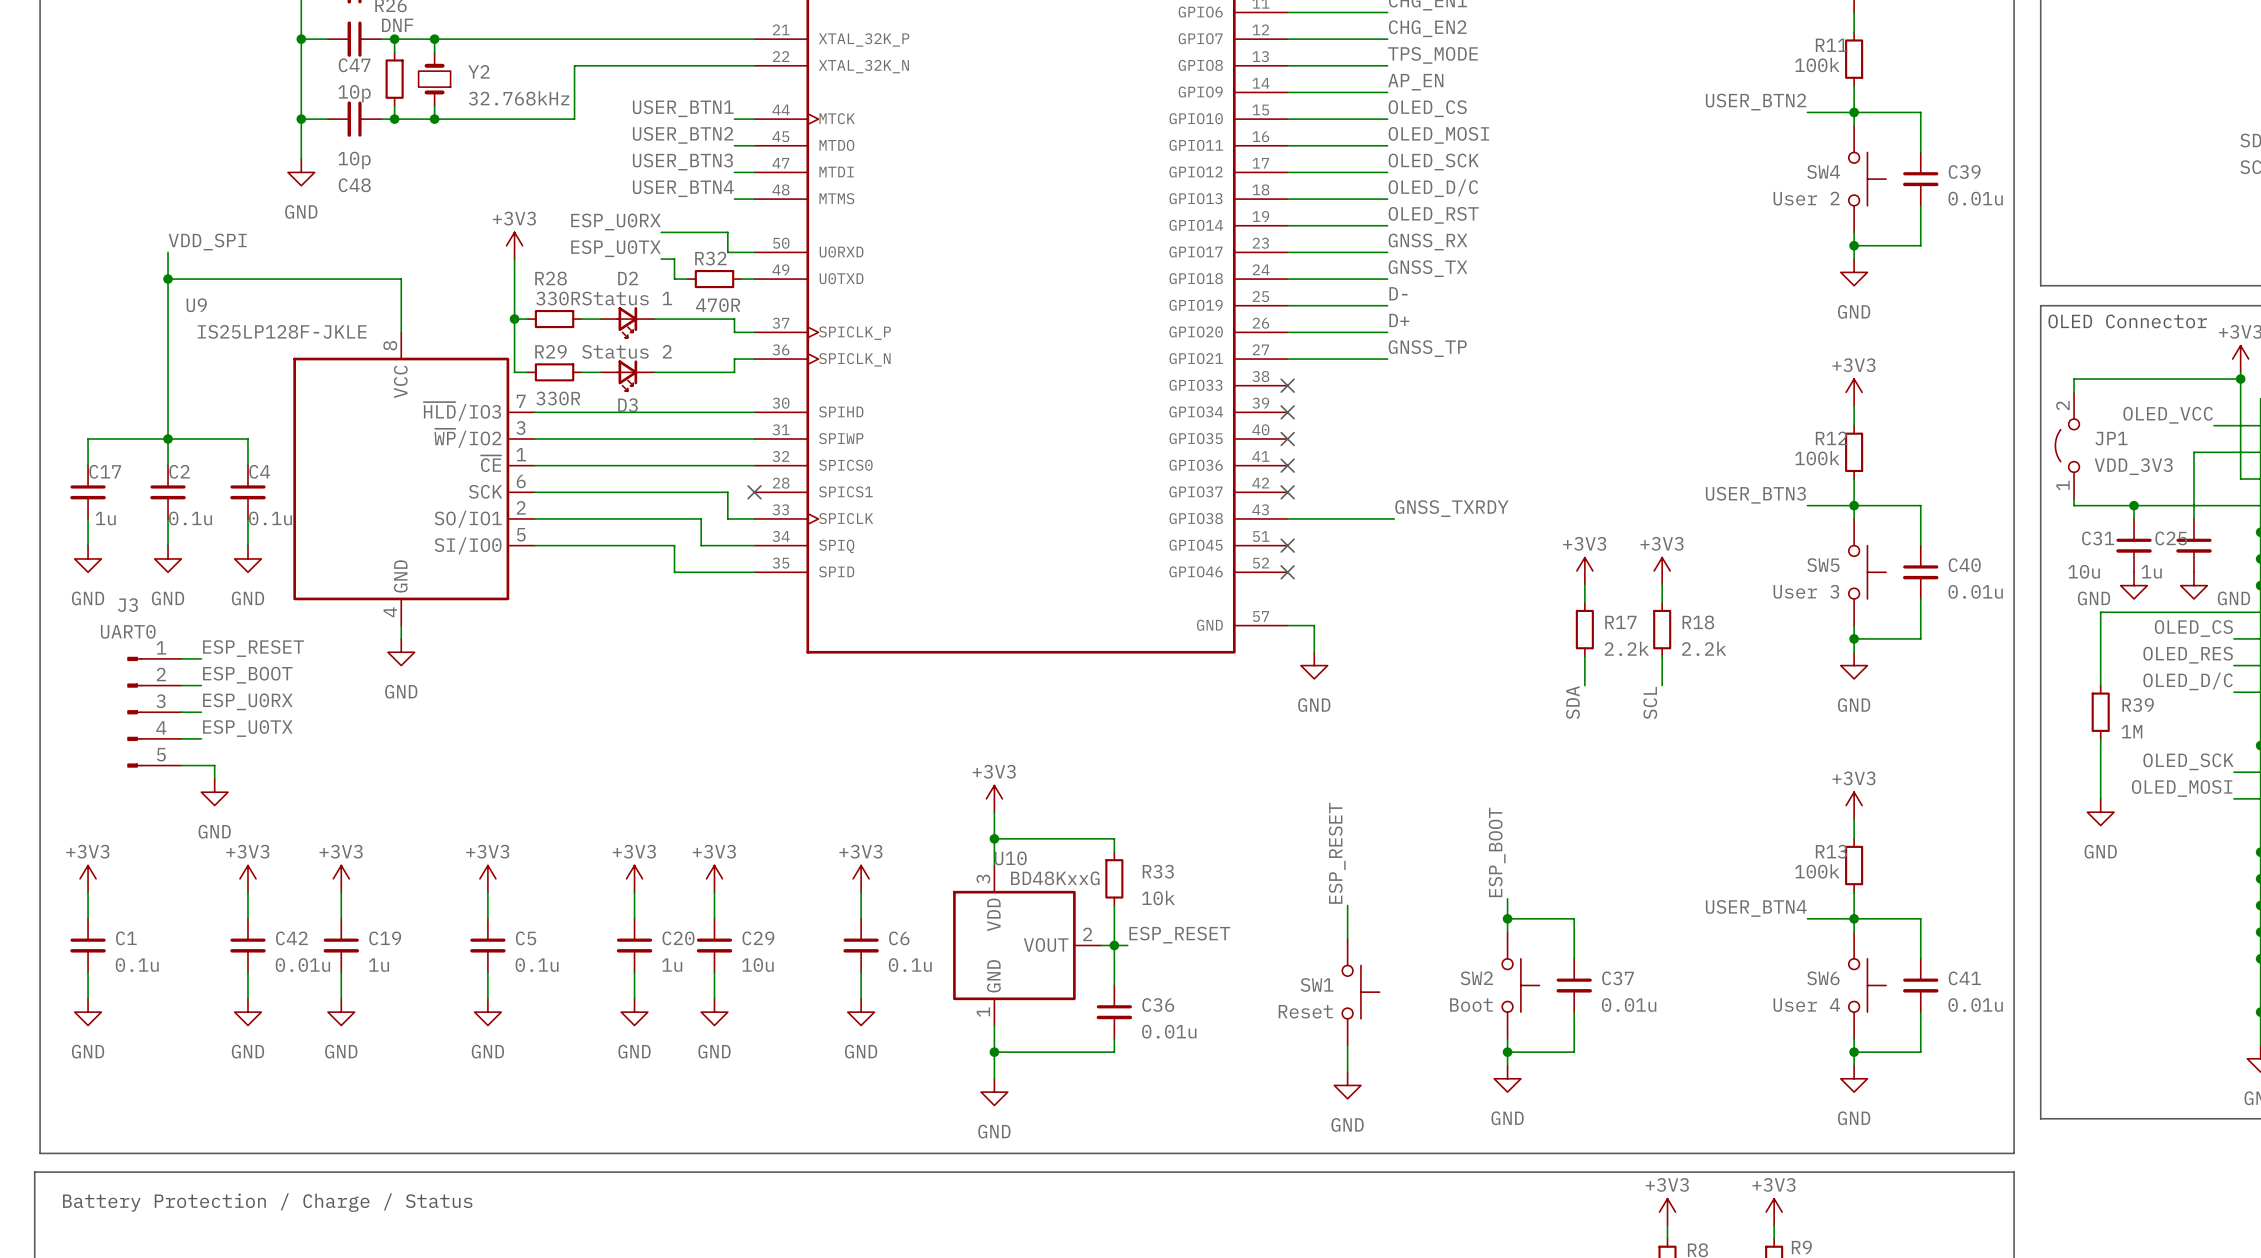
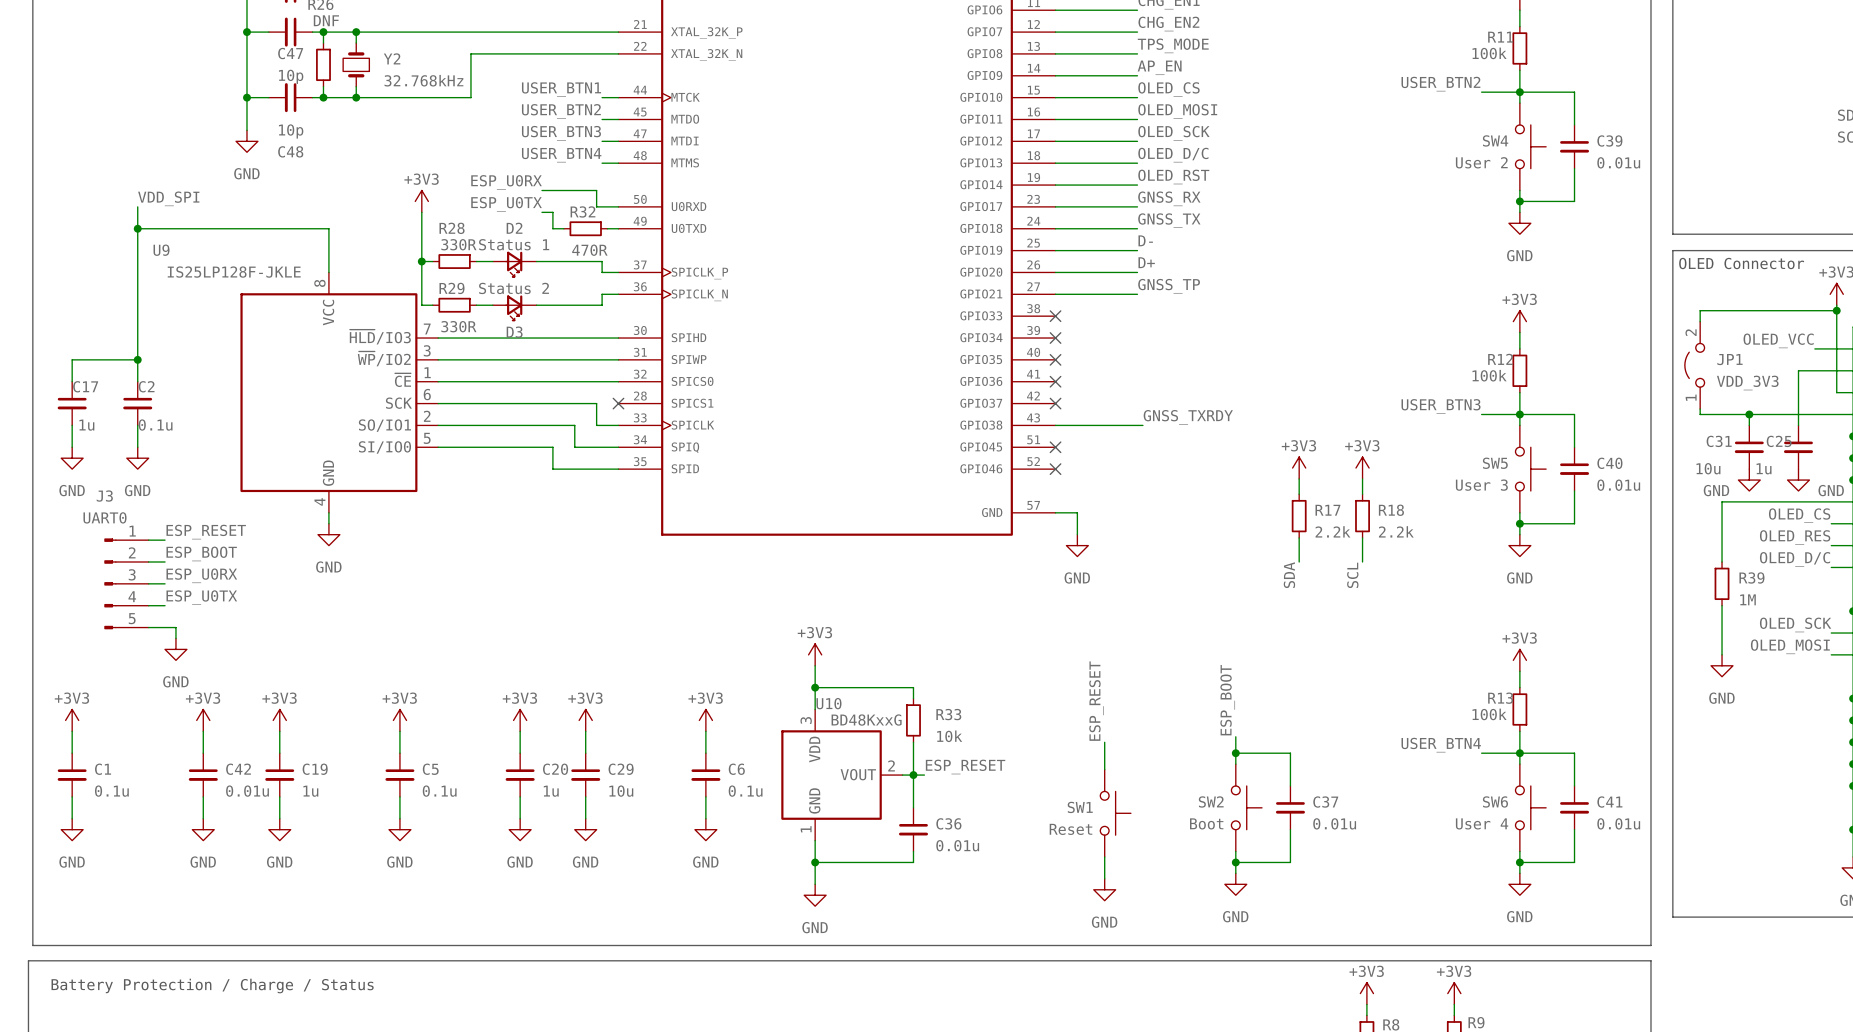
wire: (168, 439) (247, 439) (247, 465) -> none
C4: 0.1u (247, 492) -> none
wire: (247, 518) (247, 545) -> none
power symbol: GND (247, 558) -> none

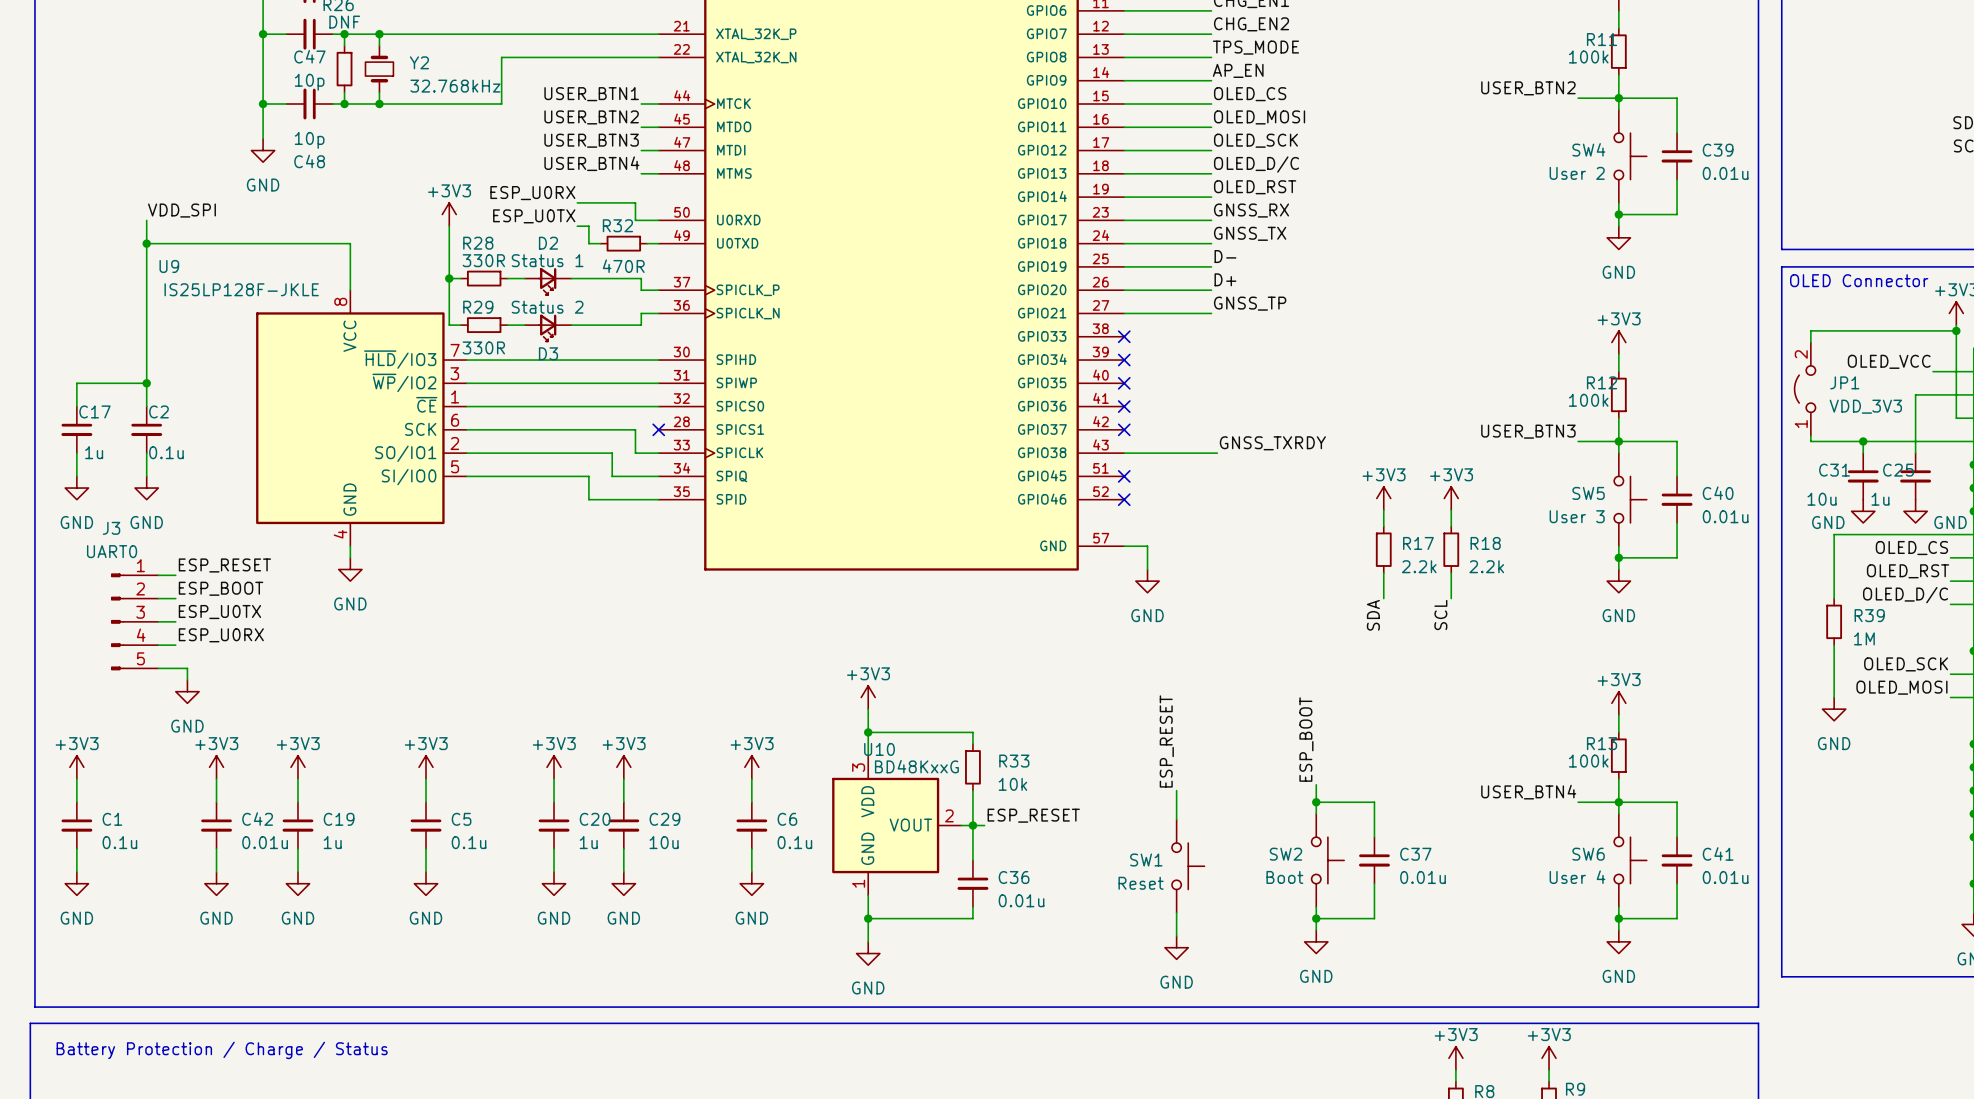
label: OLED_RES (1795, 537) -> OLED_RST (1908, 571)
label: ESP_U0RX (201, 575) -> ESP_U0TX (219, 612)
label: ESP_U0TX (201, 597) -> ESP_U0RX (221, 635)

